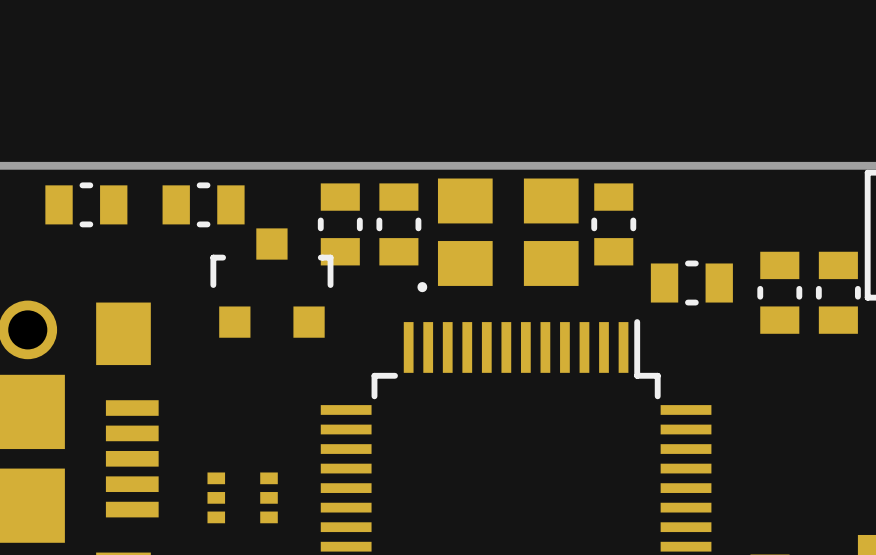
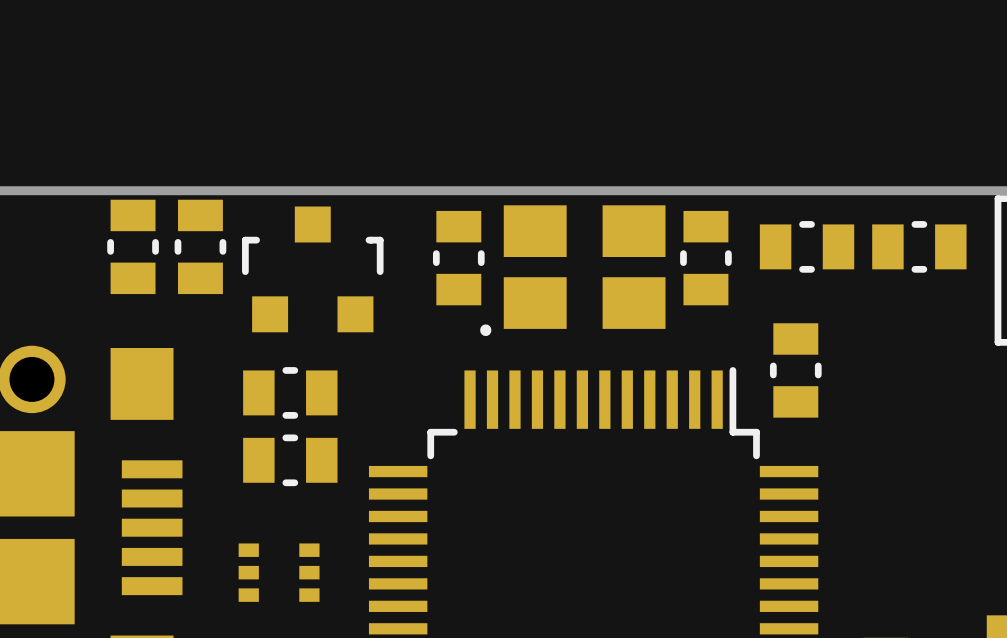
part rotation: 0° (86, 204) -> 90° clockwise (133, 246)
part rotation: 0° (203, 204) -> 90° clockwise (200, 246)
part: none -> (807, 246)
part: none -> (919, 246)
part: (340, 224) -> none
part position: (271, 283) -> (312, 269)
part: (691, 283) -> none
part: (779, 292) -> none
part: (838, 292) -> none
part: none -> (795, 370)
part: none -> (290, 392)
part: none -> (290, 460)

